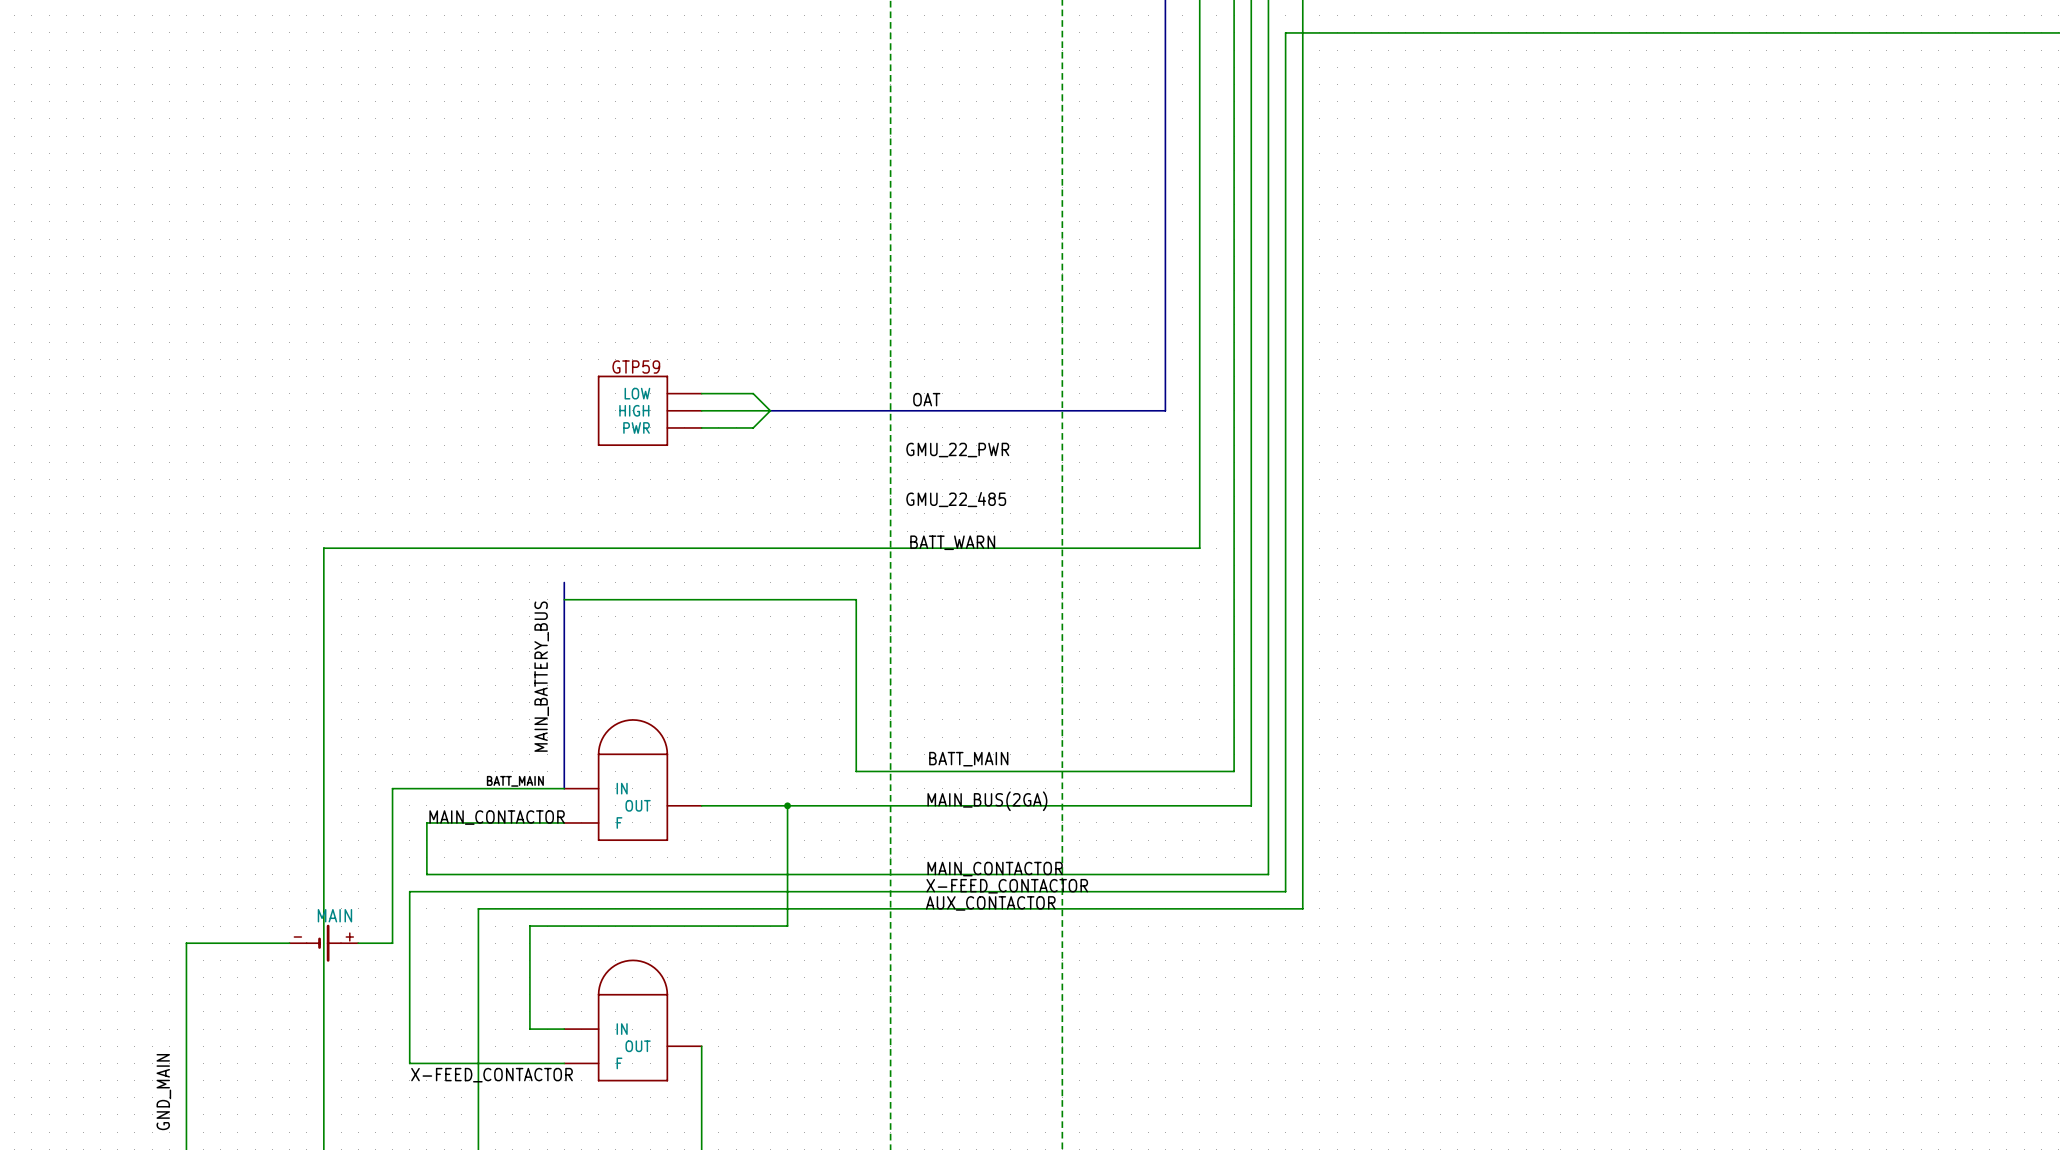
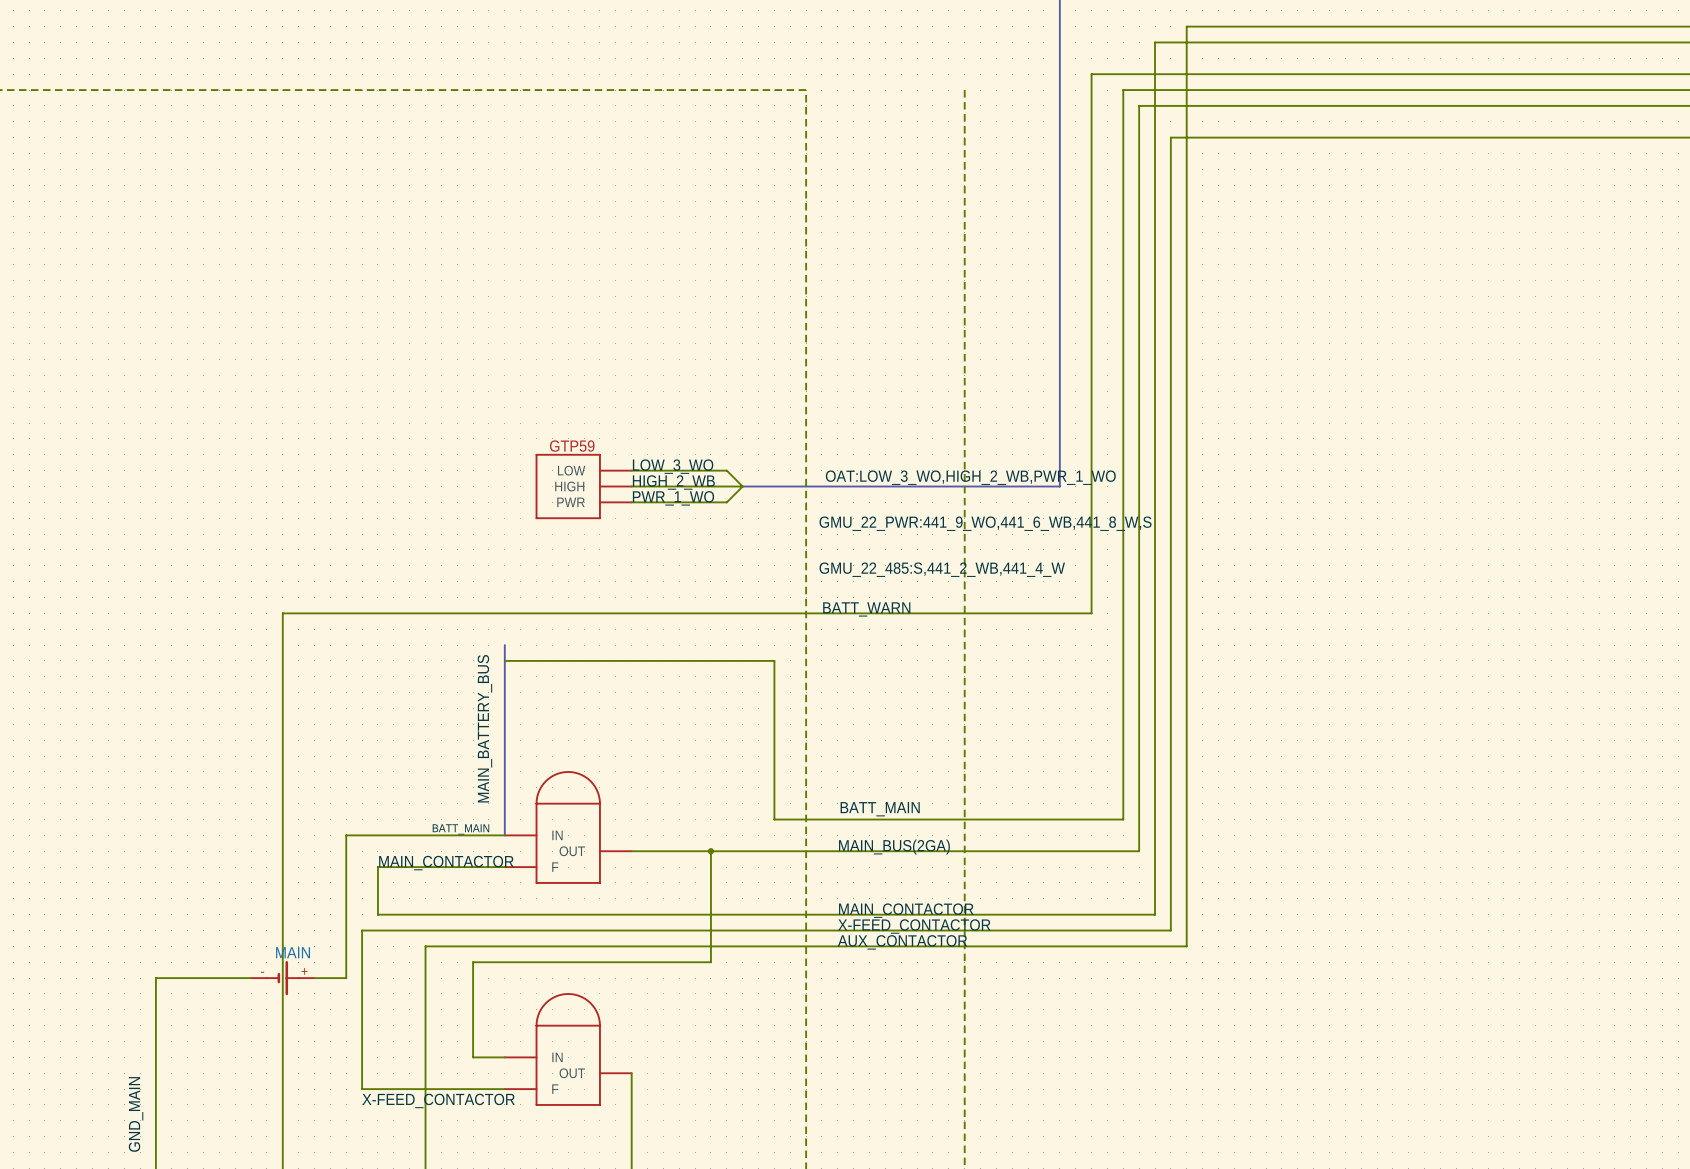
label: none -> LOW_3_WO (673, 466)
wire: (753, 393) (770, 410) (753, 427) -> (742, 486) (726, 502) (679, 502)
wire: none -> (679, 470) (726, 470) (742, 486)
label: OAT (926, 399) -> OAT:LOW_3_WO,HIGH_2_WB,PWR_1_WO (970, 477)
label: none -> HIGH_2_WB (673, 482)
bus: (770, 410) (821, 410) -> none
label: none -> PWR_1_WO (673, 498)
label: GMU_22_PWR (957, 450) -> GMU_22_PWR:441_9_WO,441_6_WB,441_8_W,S (985, 523)
label: GMU_22_485 (956, 499) -> GMU_22_485:S,441_2_WB,441_4_W (942, 569)

